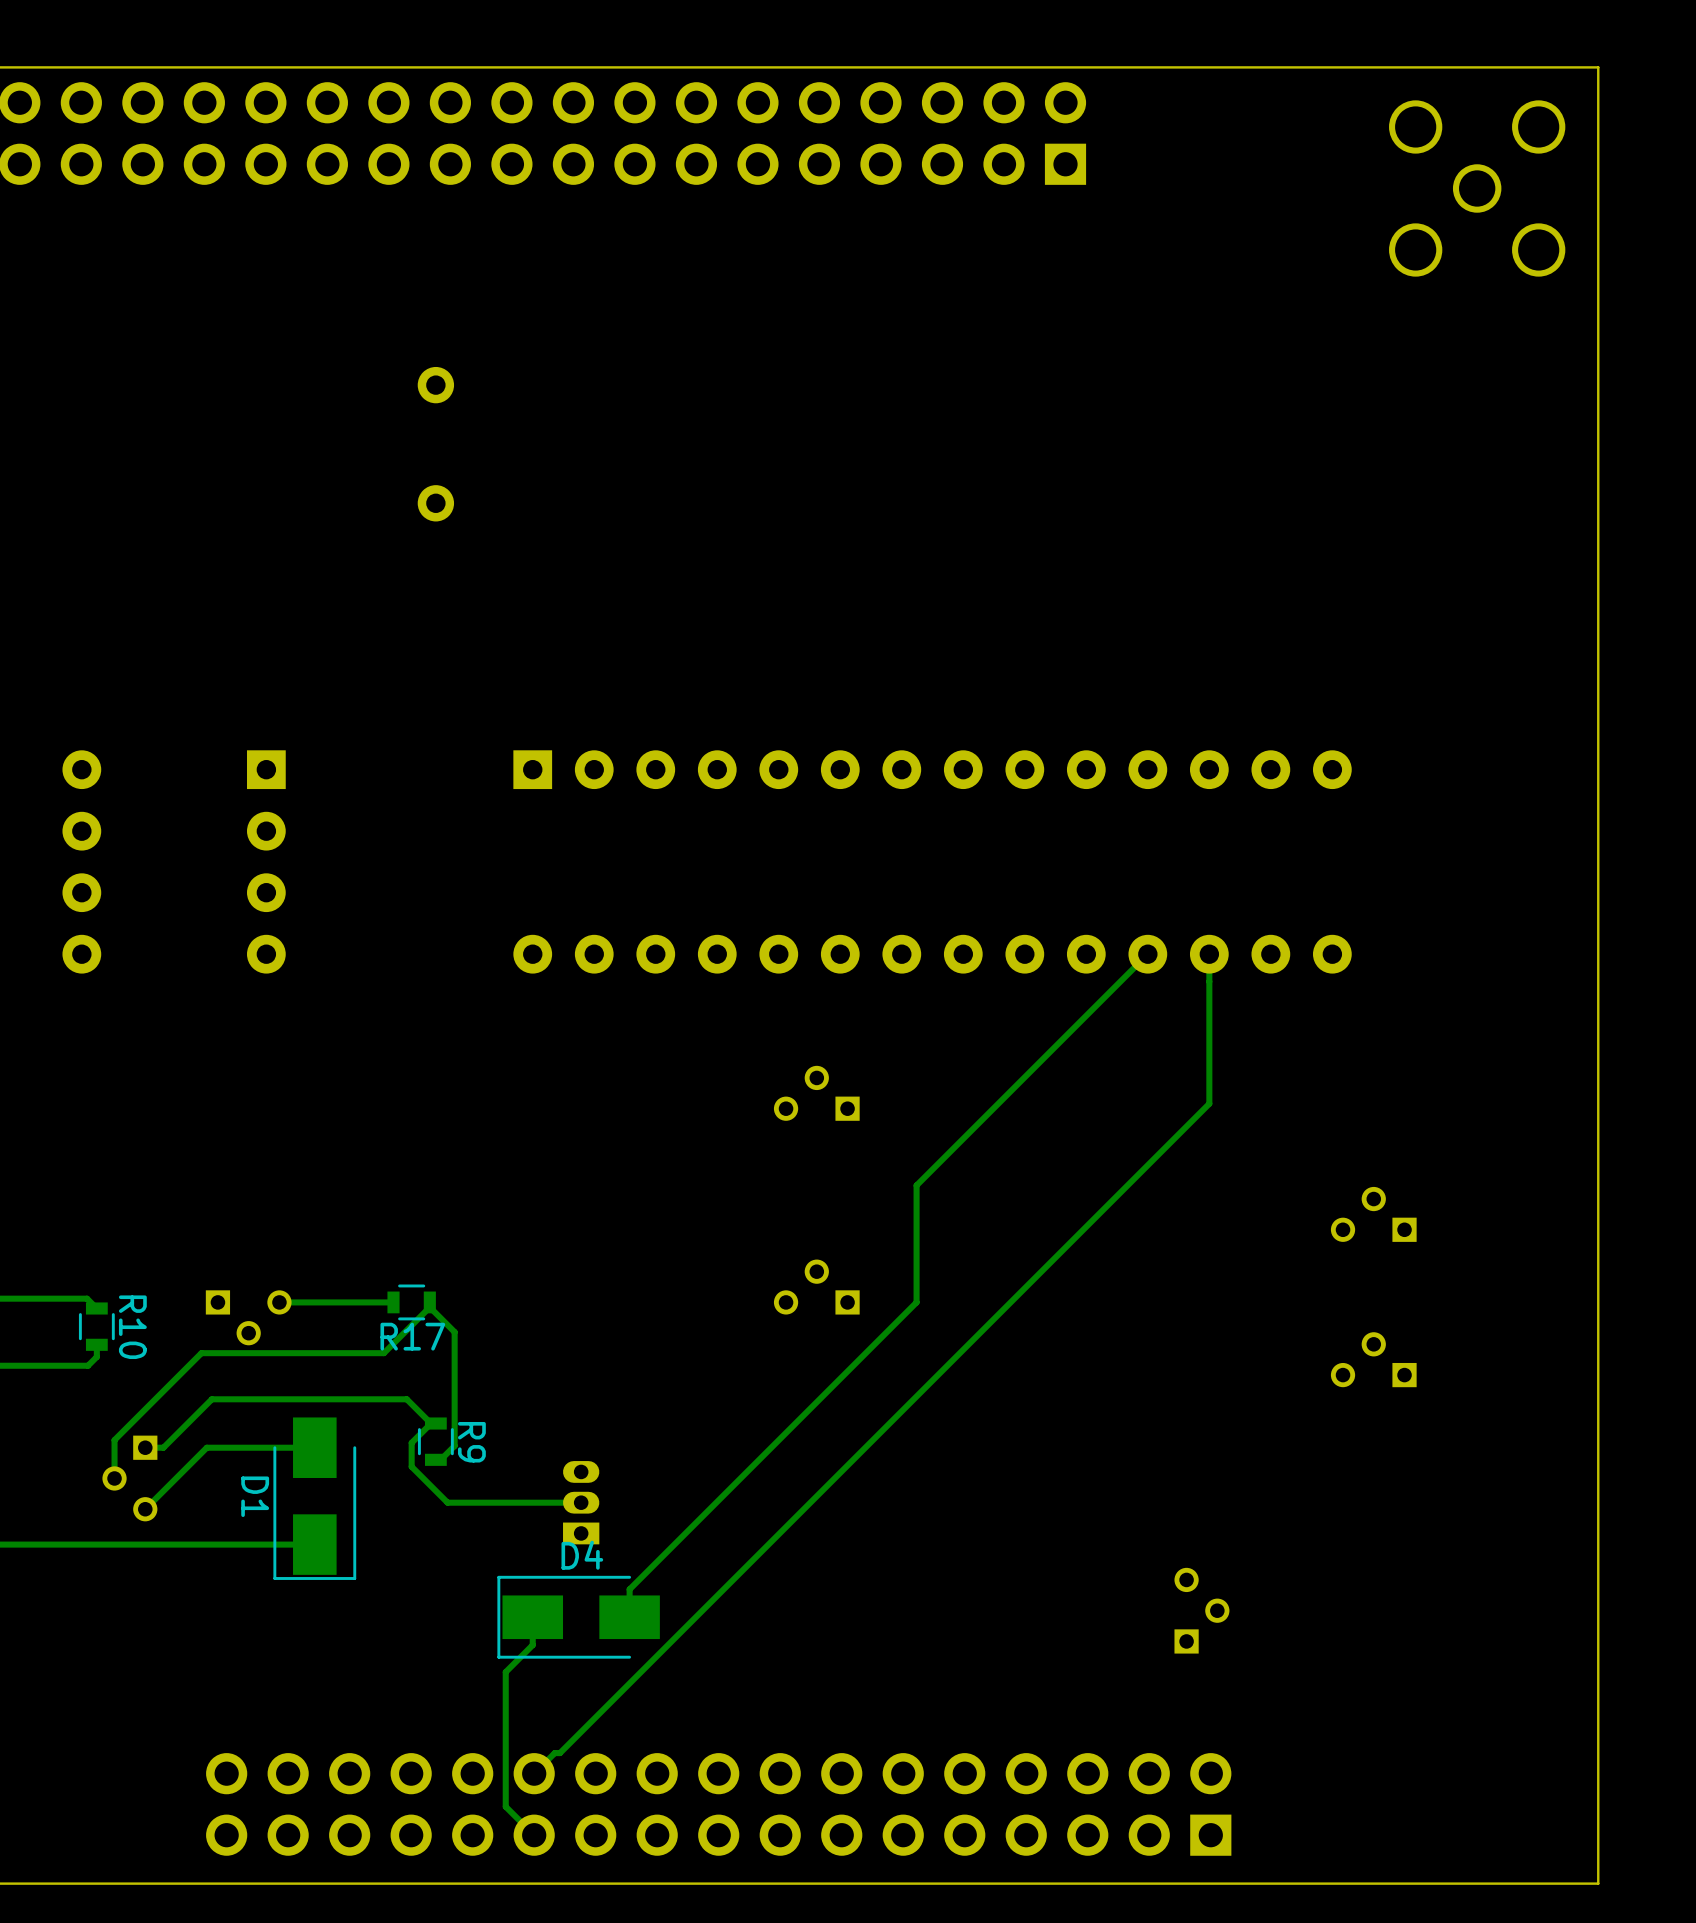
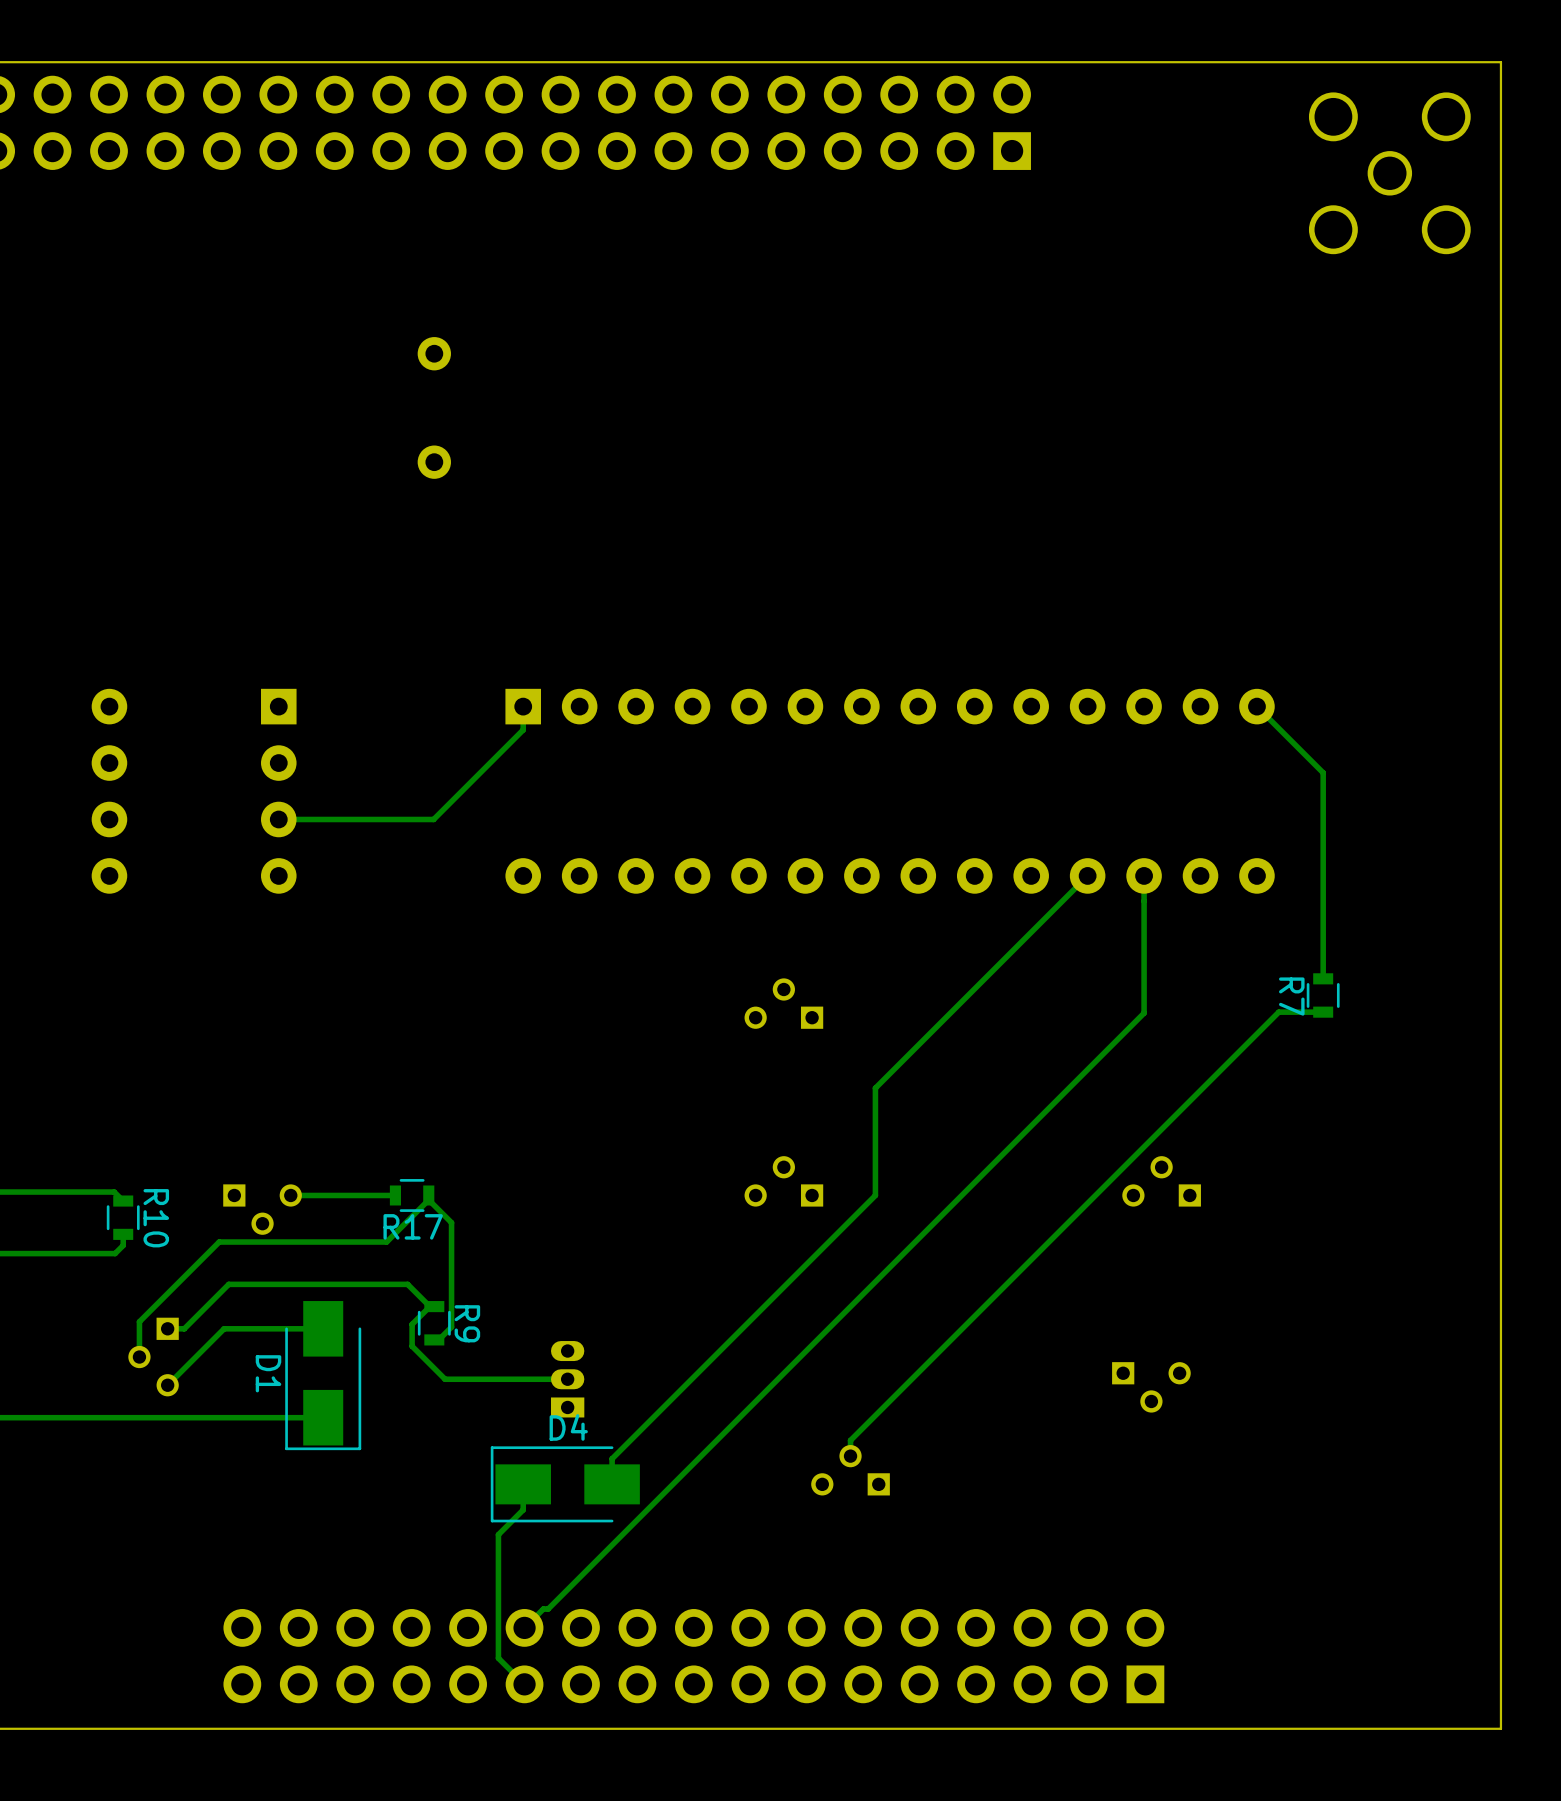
track: none -> (523, 706) (523, 729) (433, 819) (278, 819)
track: none -> (1256, 706) (1323, 772) (1323, 978)
R7: none -> (1323, 995)
track: none -> (1323, 1012) (1278, 1012) (850, 1440) (850, 1456)
part: (1373, 1214) -> none
part: none -> (1161, 1181)
part: (1373, 1359) -> none
part: none -> (850, 1470)
part rotation: 0° (1201, 1610) -> 90° clockwise (1151, 1387)
part position: (1201, 1610) -> (1151, 1387)

